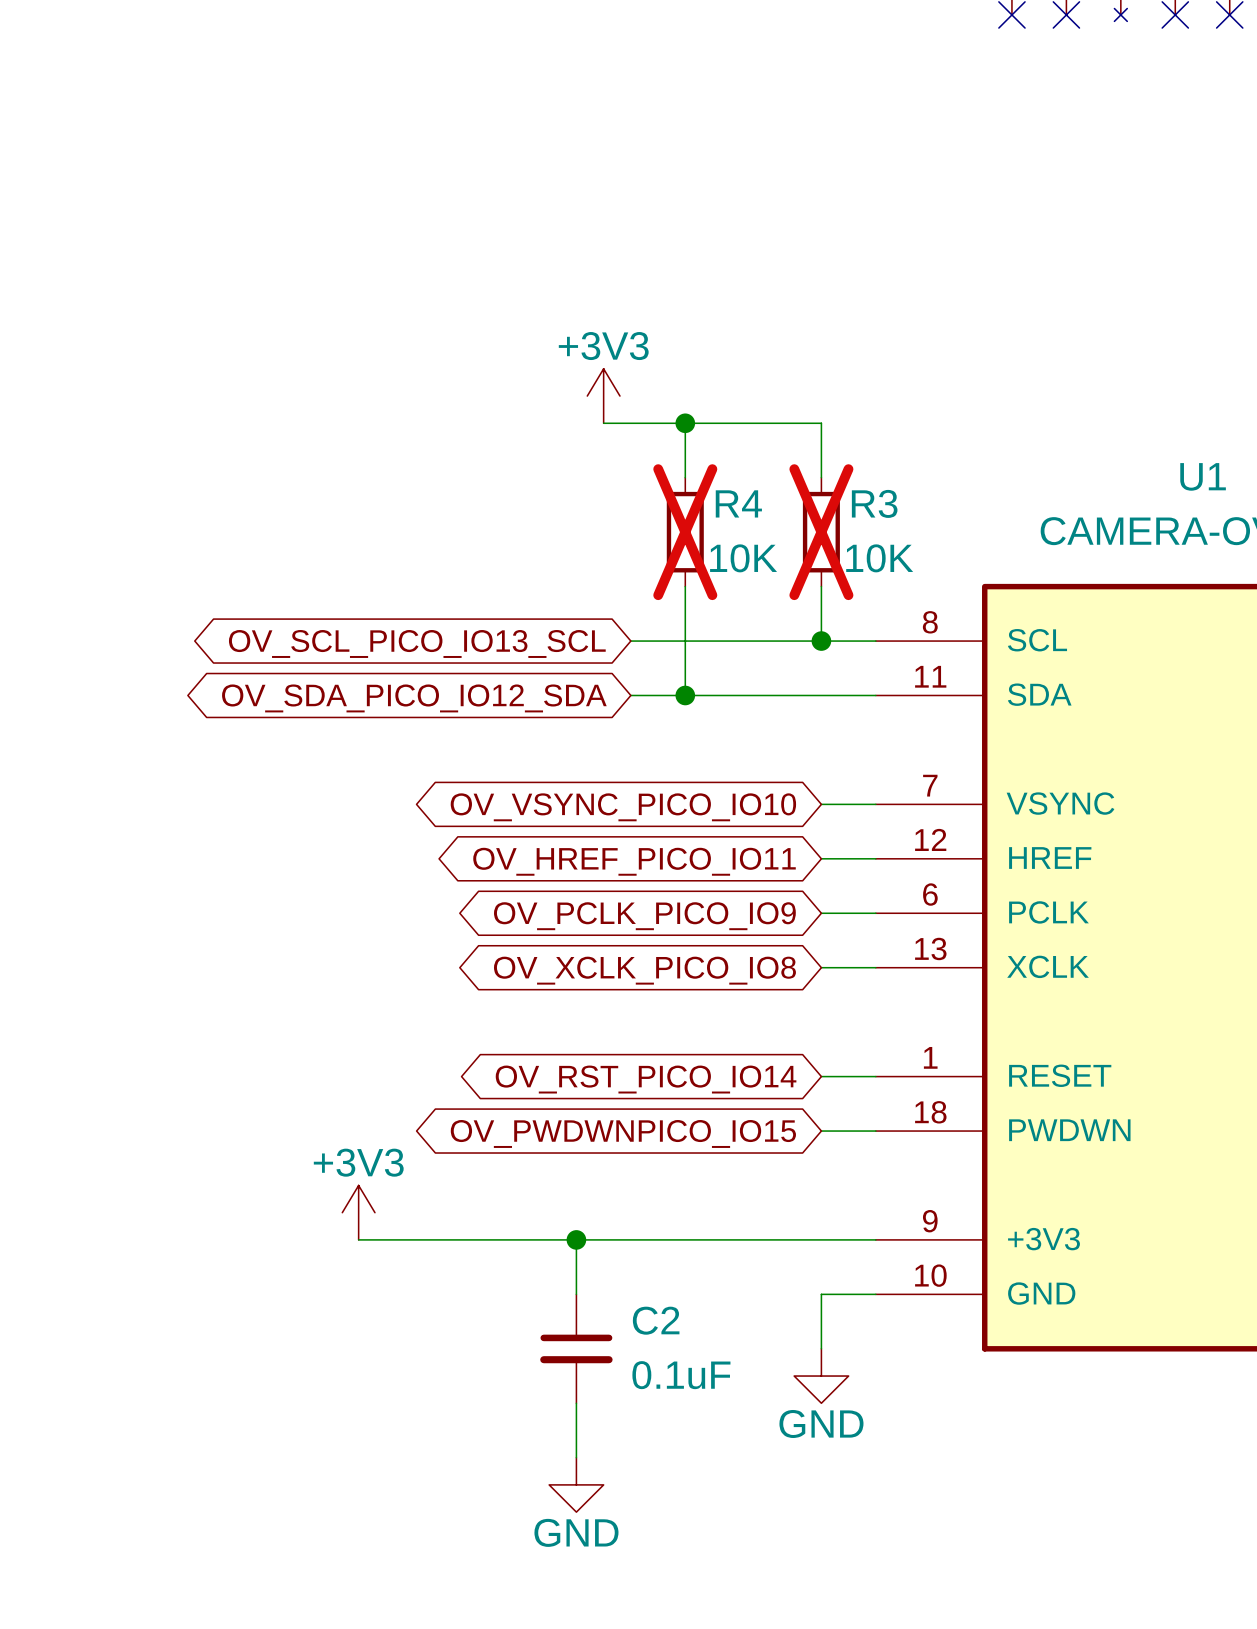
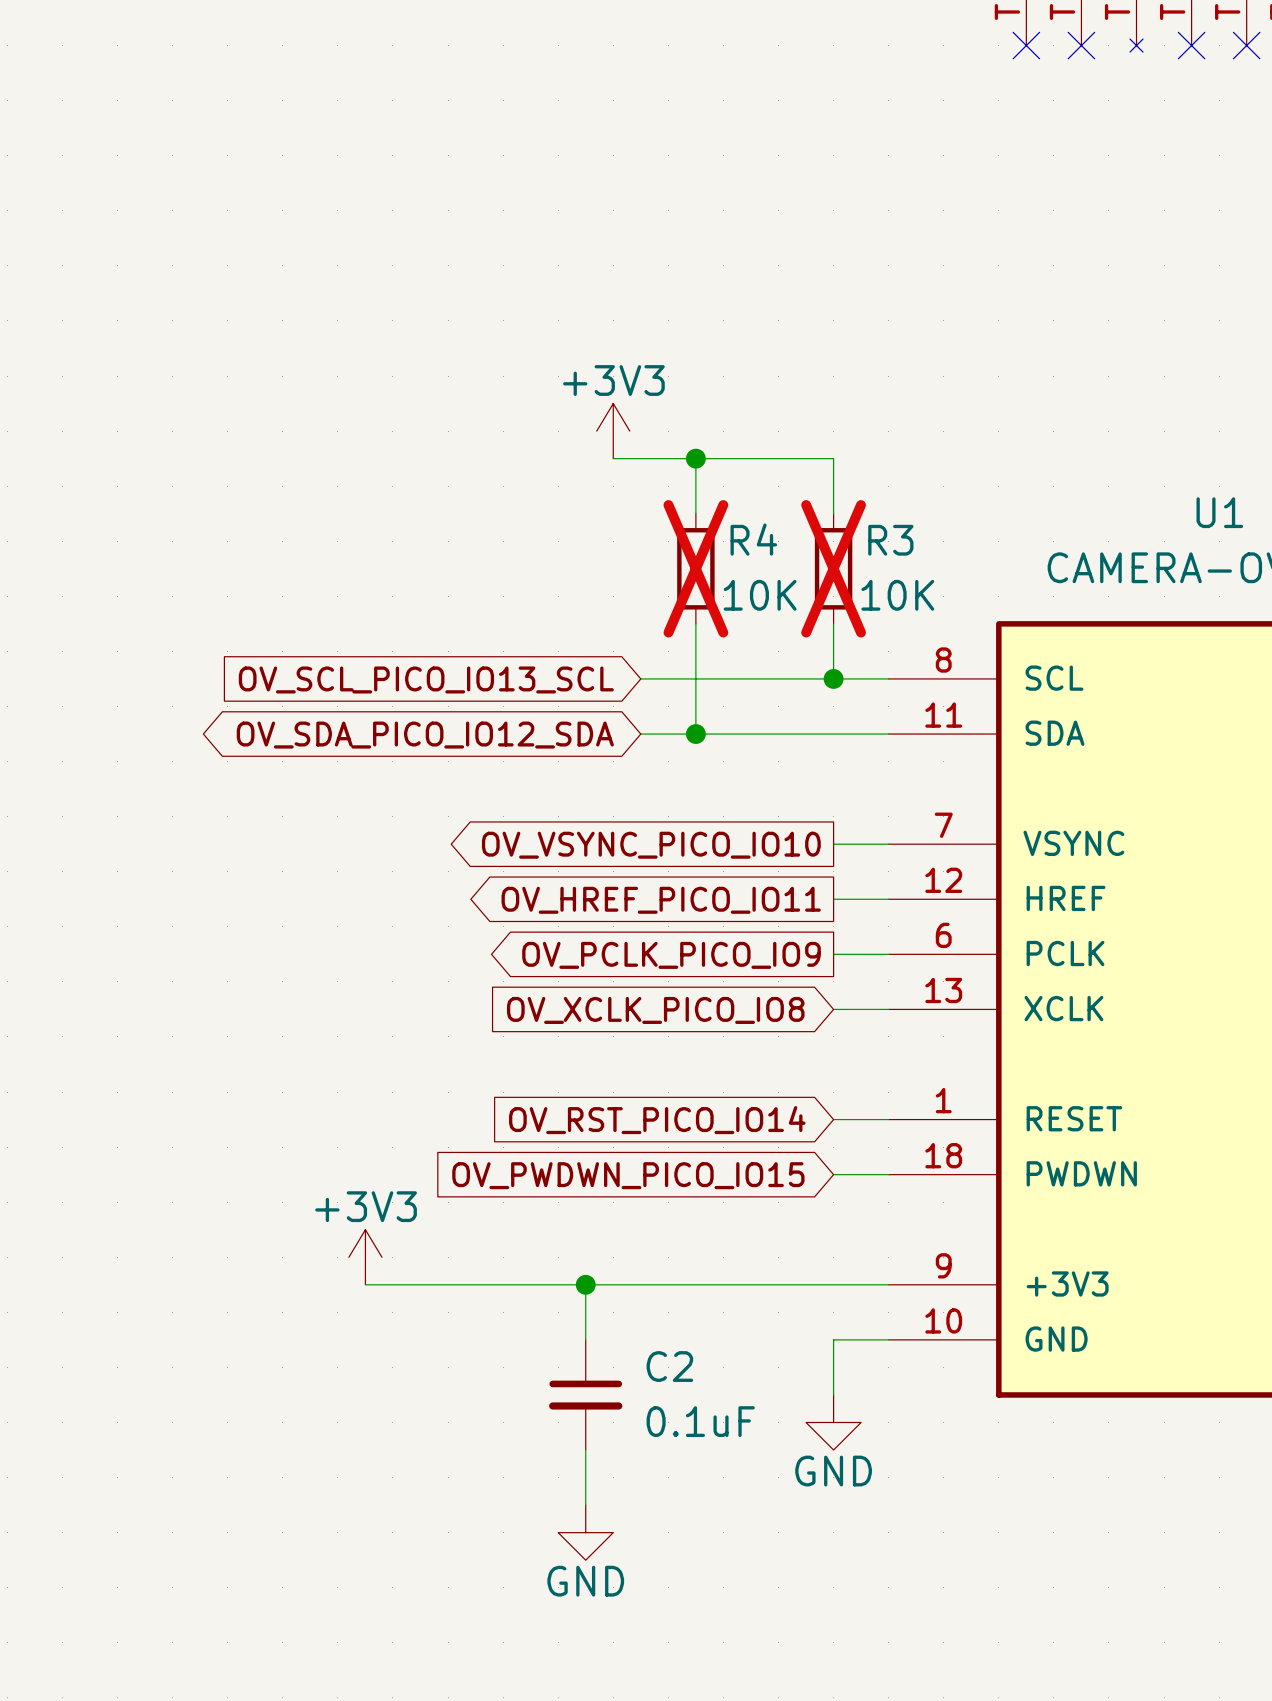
global label shape: bidirectional (417, 643) -> input (426, 679)
global label shape: bidirectional (623, 807) -> output (651, 845)
global label shape: bidirectional (634, 861) -> output (661, 900)
global label shape: bidirectional (644, 916) -> output (671, 955)
global label shape: bidirectional (644, 970) -> input (655, 1010)
global label shape: bidirectional (646, 1079) -> input (657, 1120)
global label shape: bidirectional (623, 1133) -> input (628, 1175)
global label: OV_PWDWNPICO_IO15 (623, 1133) -> OV_PWDWN_PICO_IO15 (628, 1175)

